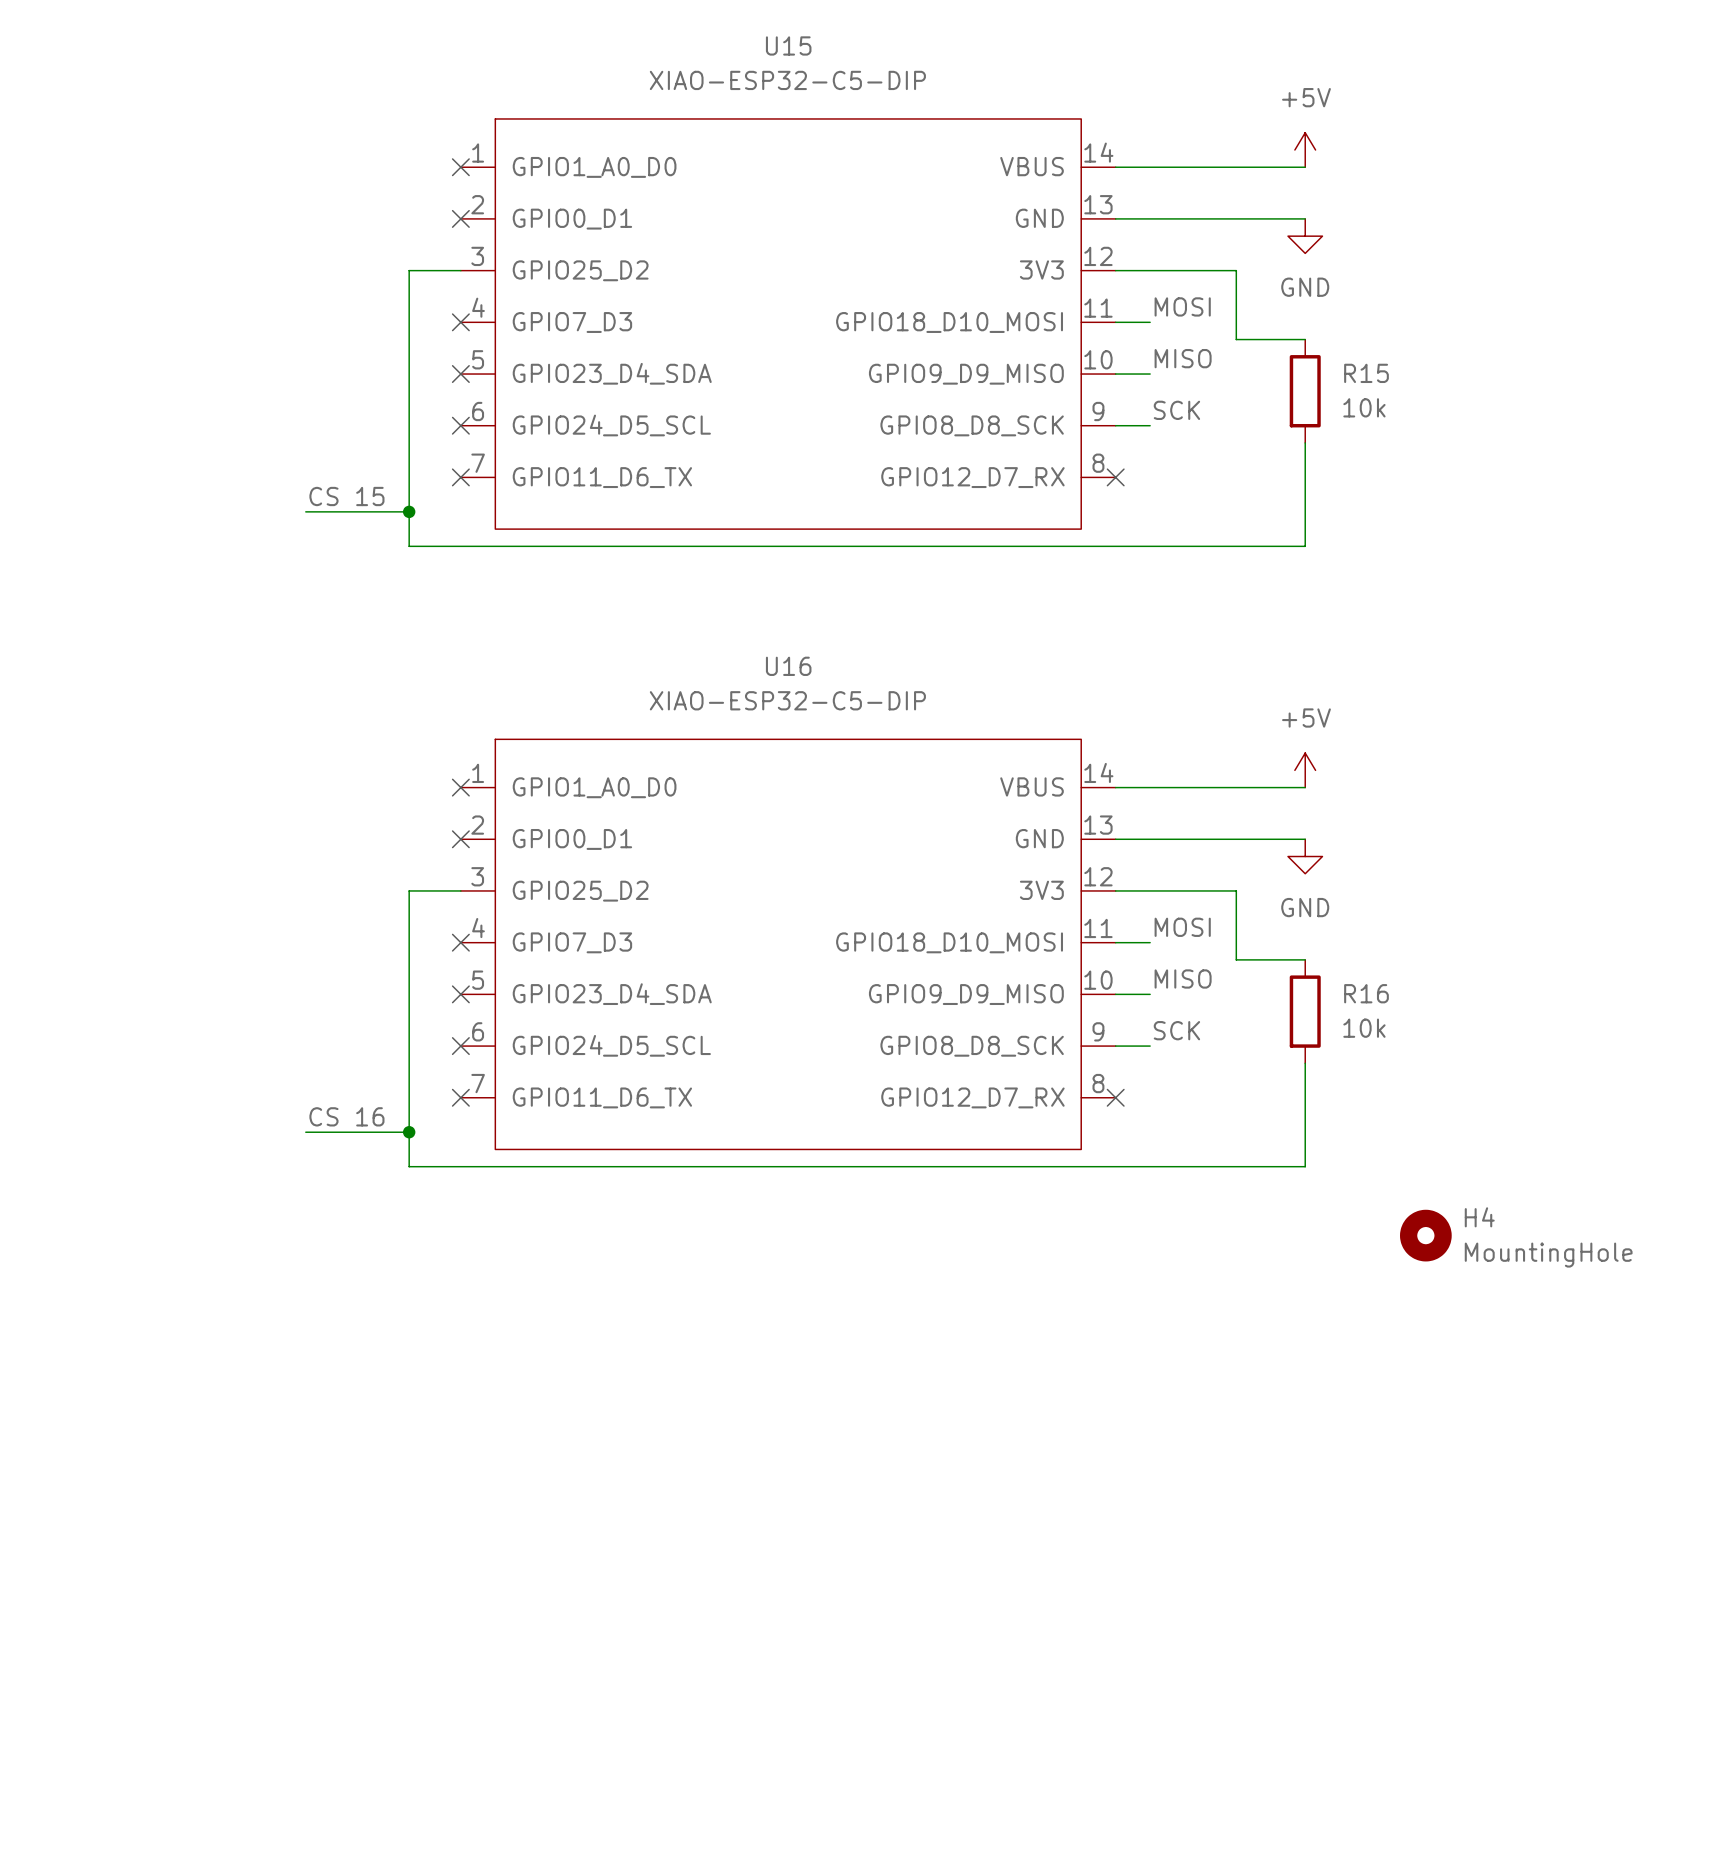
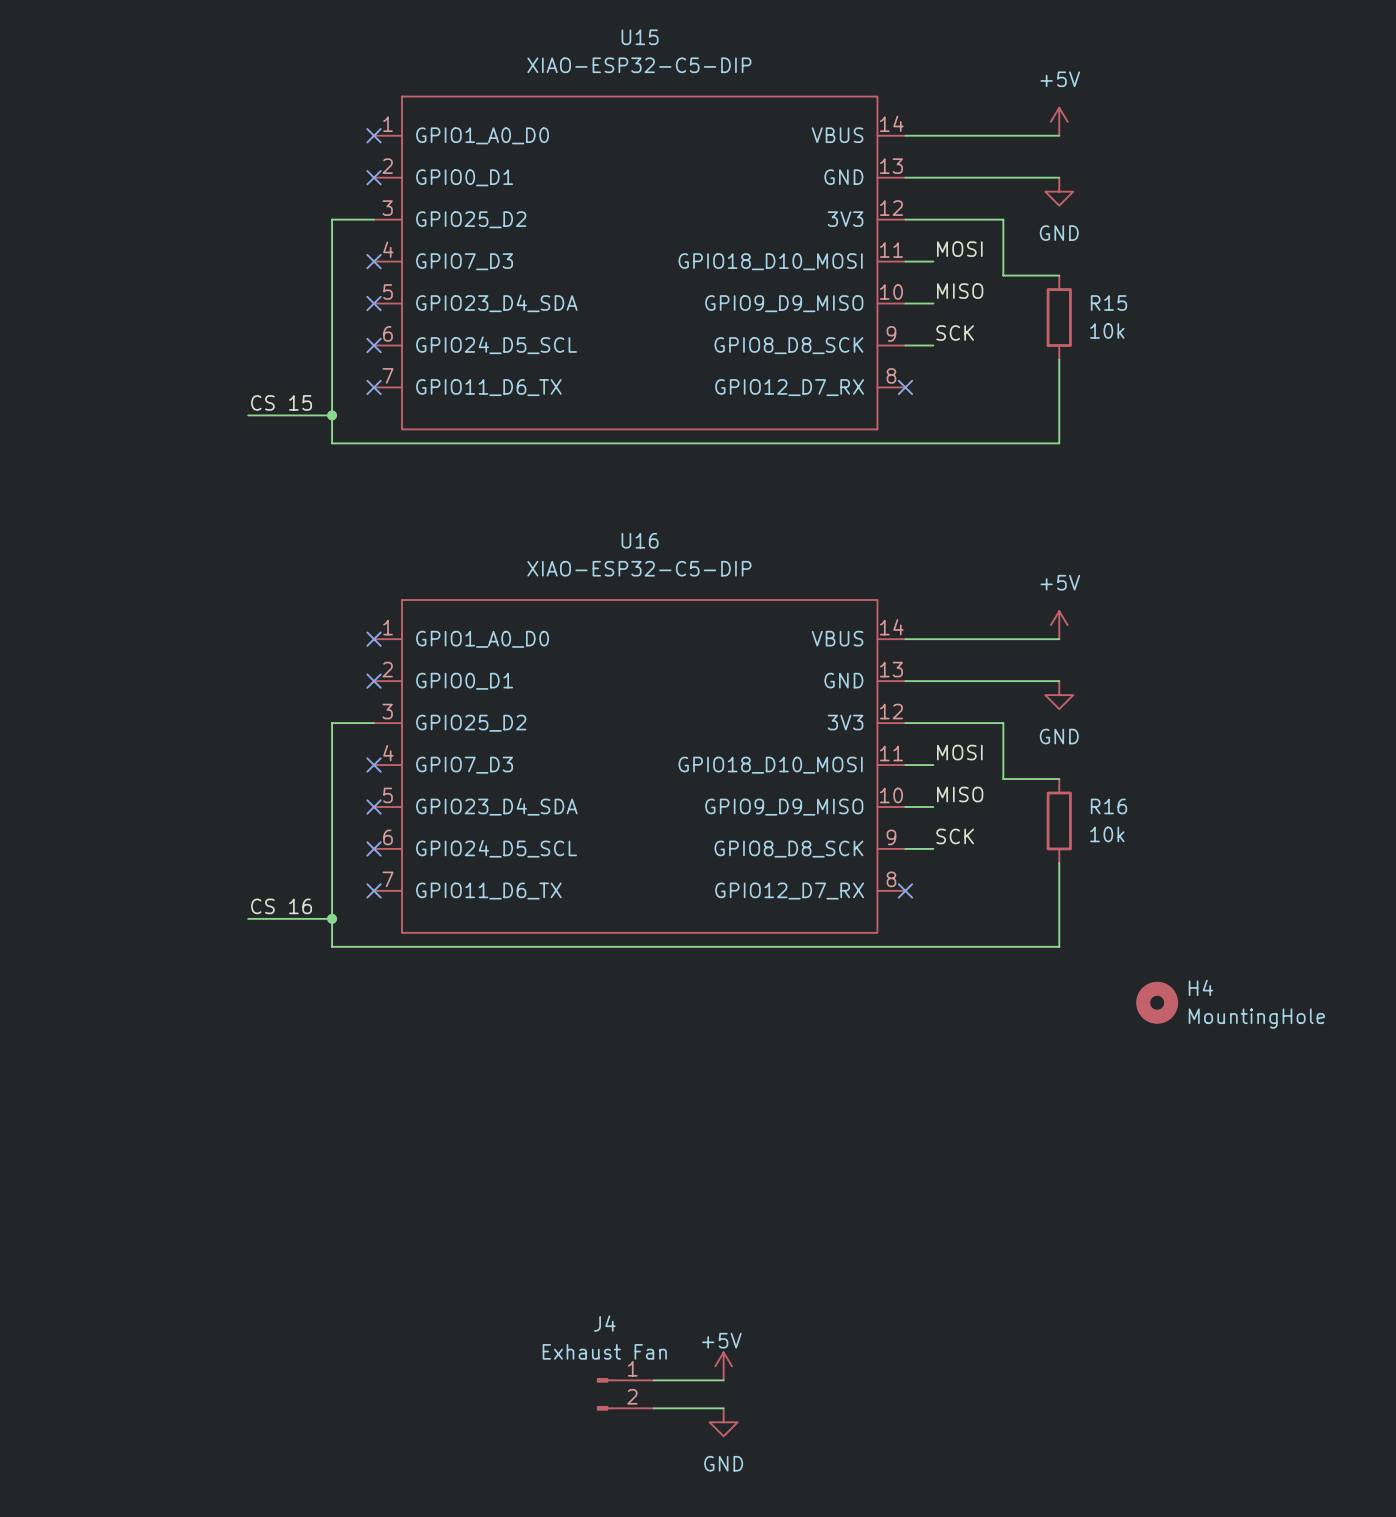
power symbol: none -> +5V (723, 1366)
wire: none -> (653, 1380) (723, 1380)
J4: none -> Exhaust Fan (625, 1394)
wire: none -> (653, 1408) (723, 1408)
power symbol: none -> GND (723, 1422)

